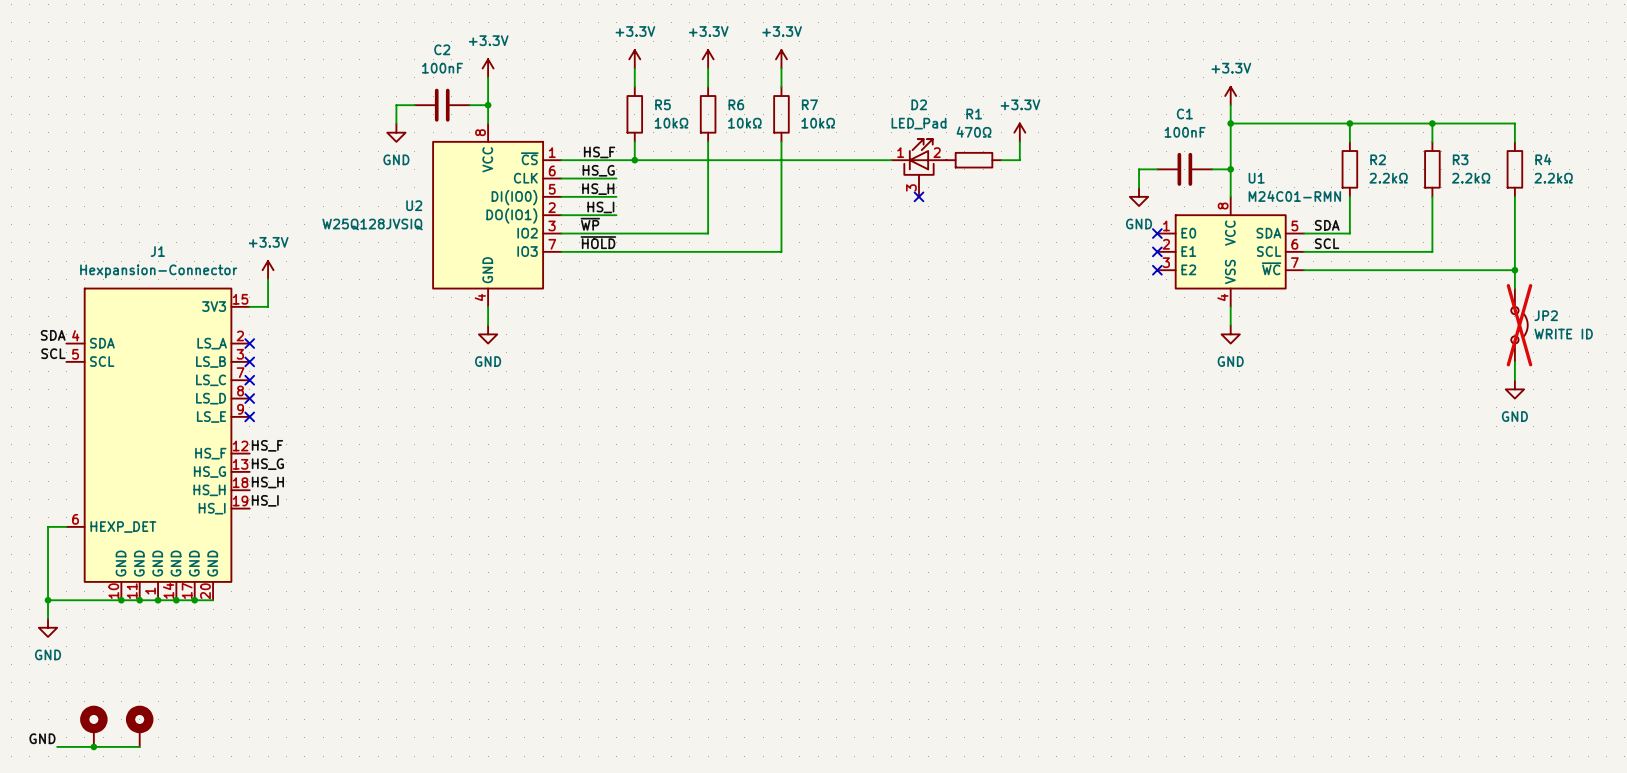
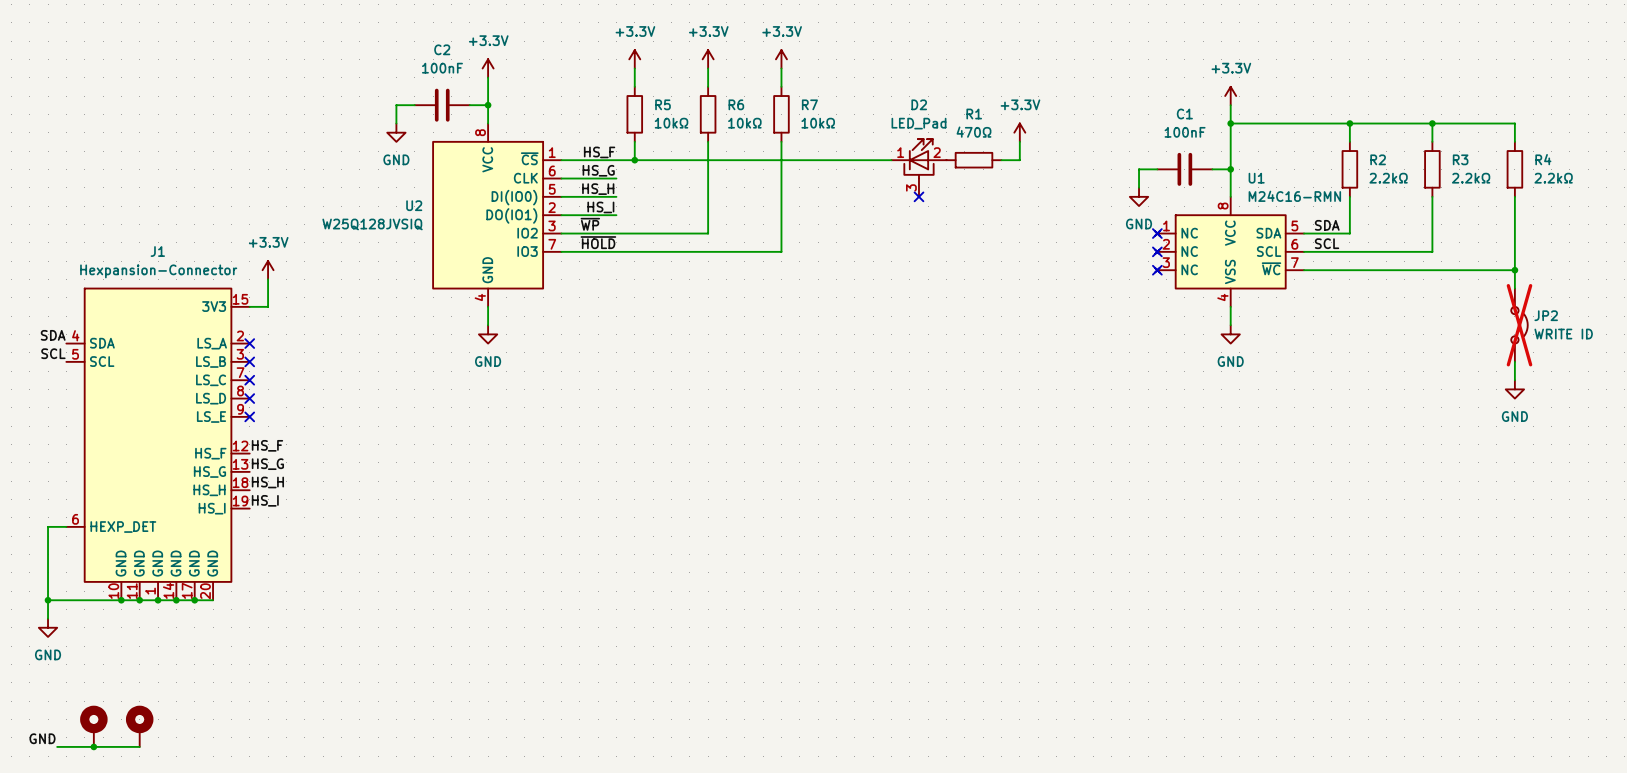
U1 symbol: [1157, 196, 1305, 307] -> [1155, 196, 1305, 307]
U1 value: M24C01-RMN (1294, 196) -> M24C16-RMN (1294, 196)

